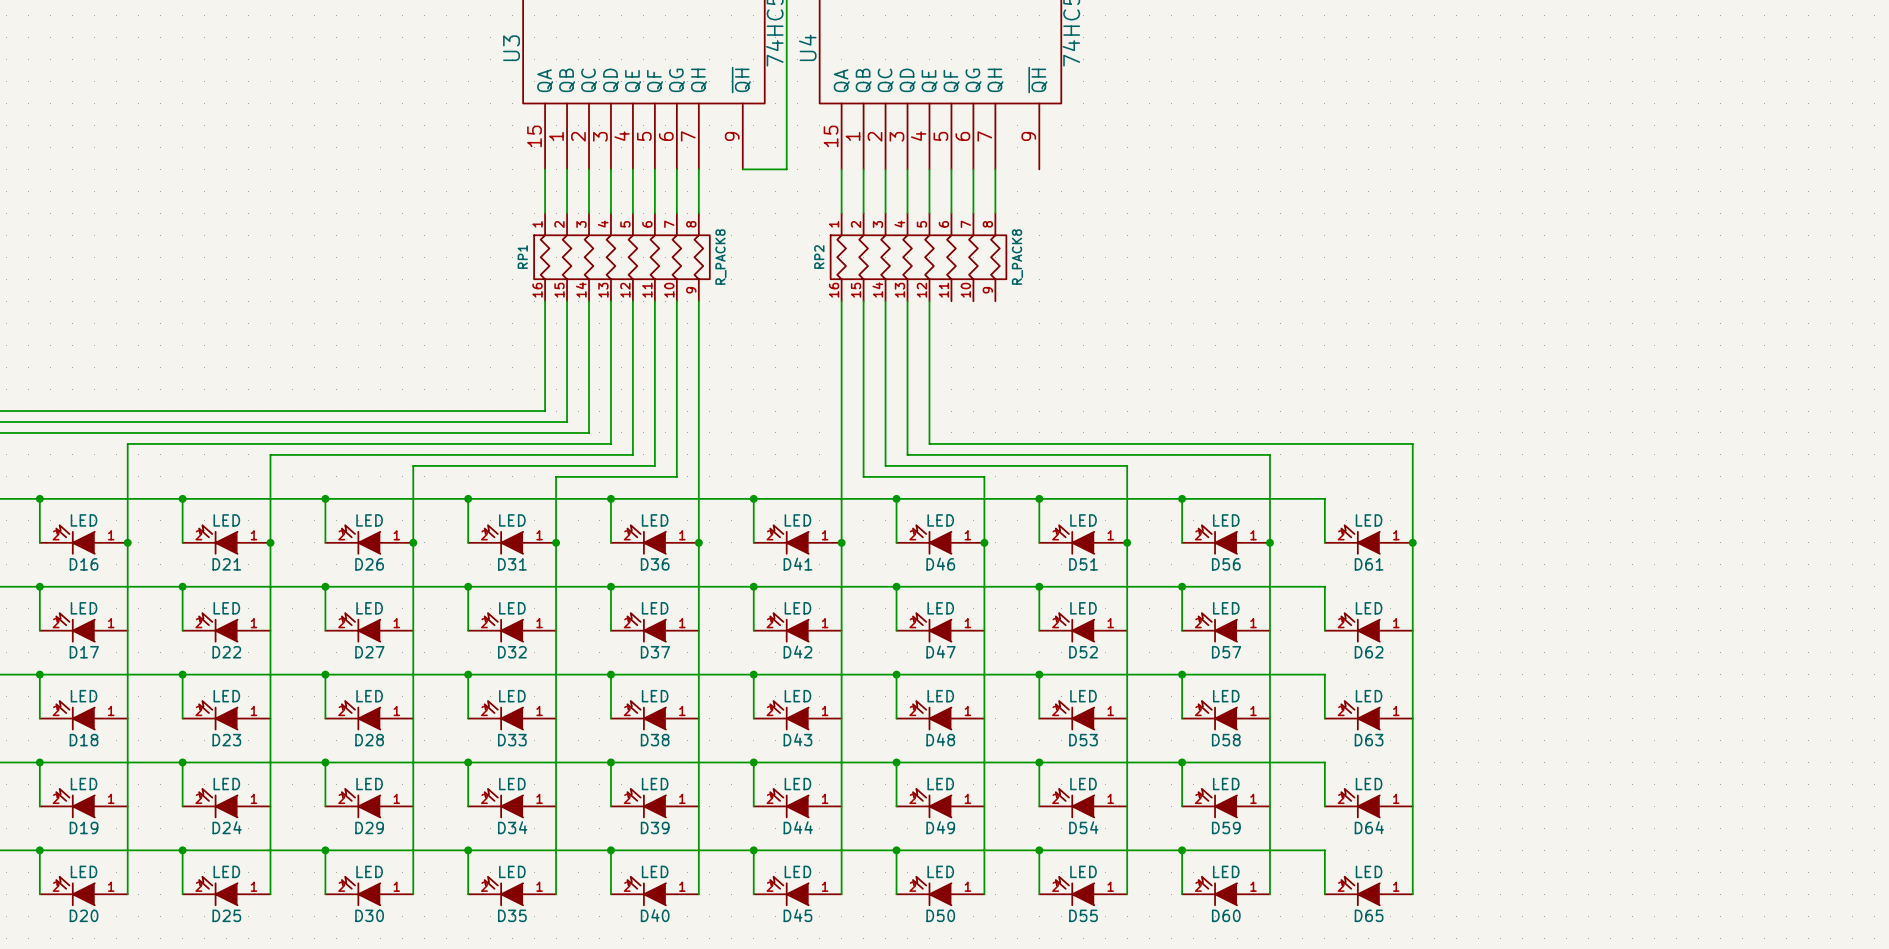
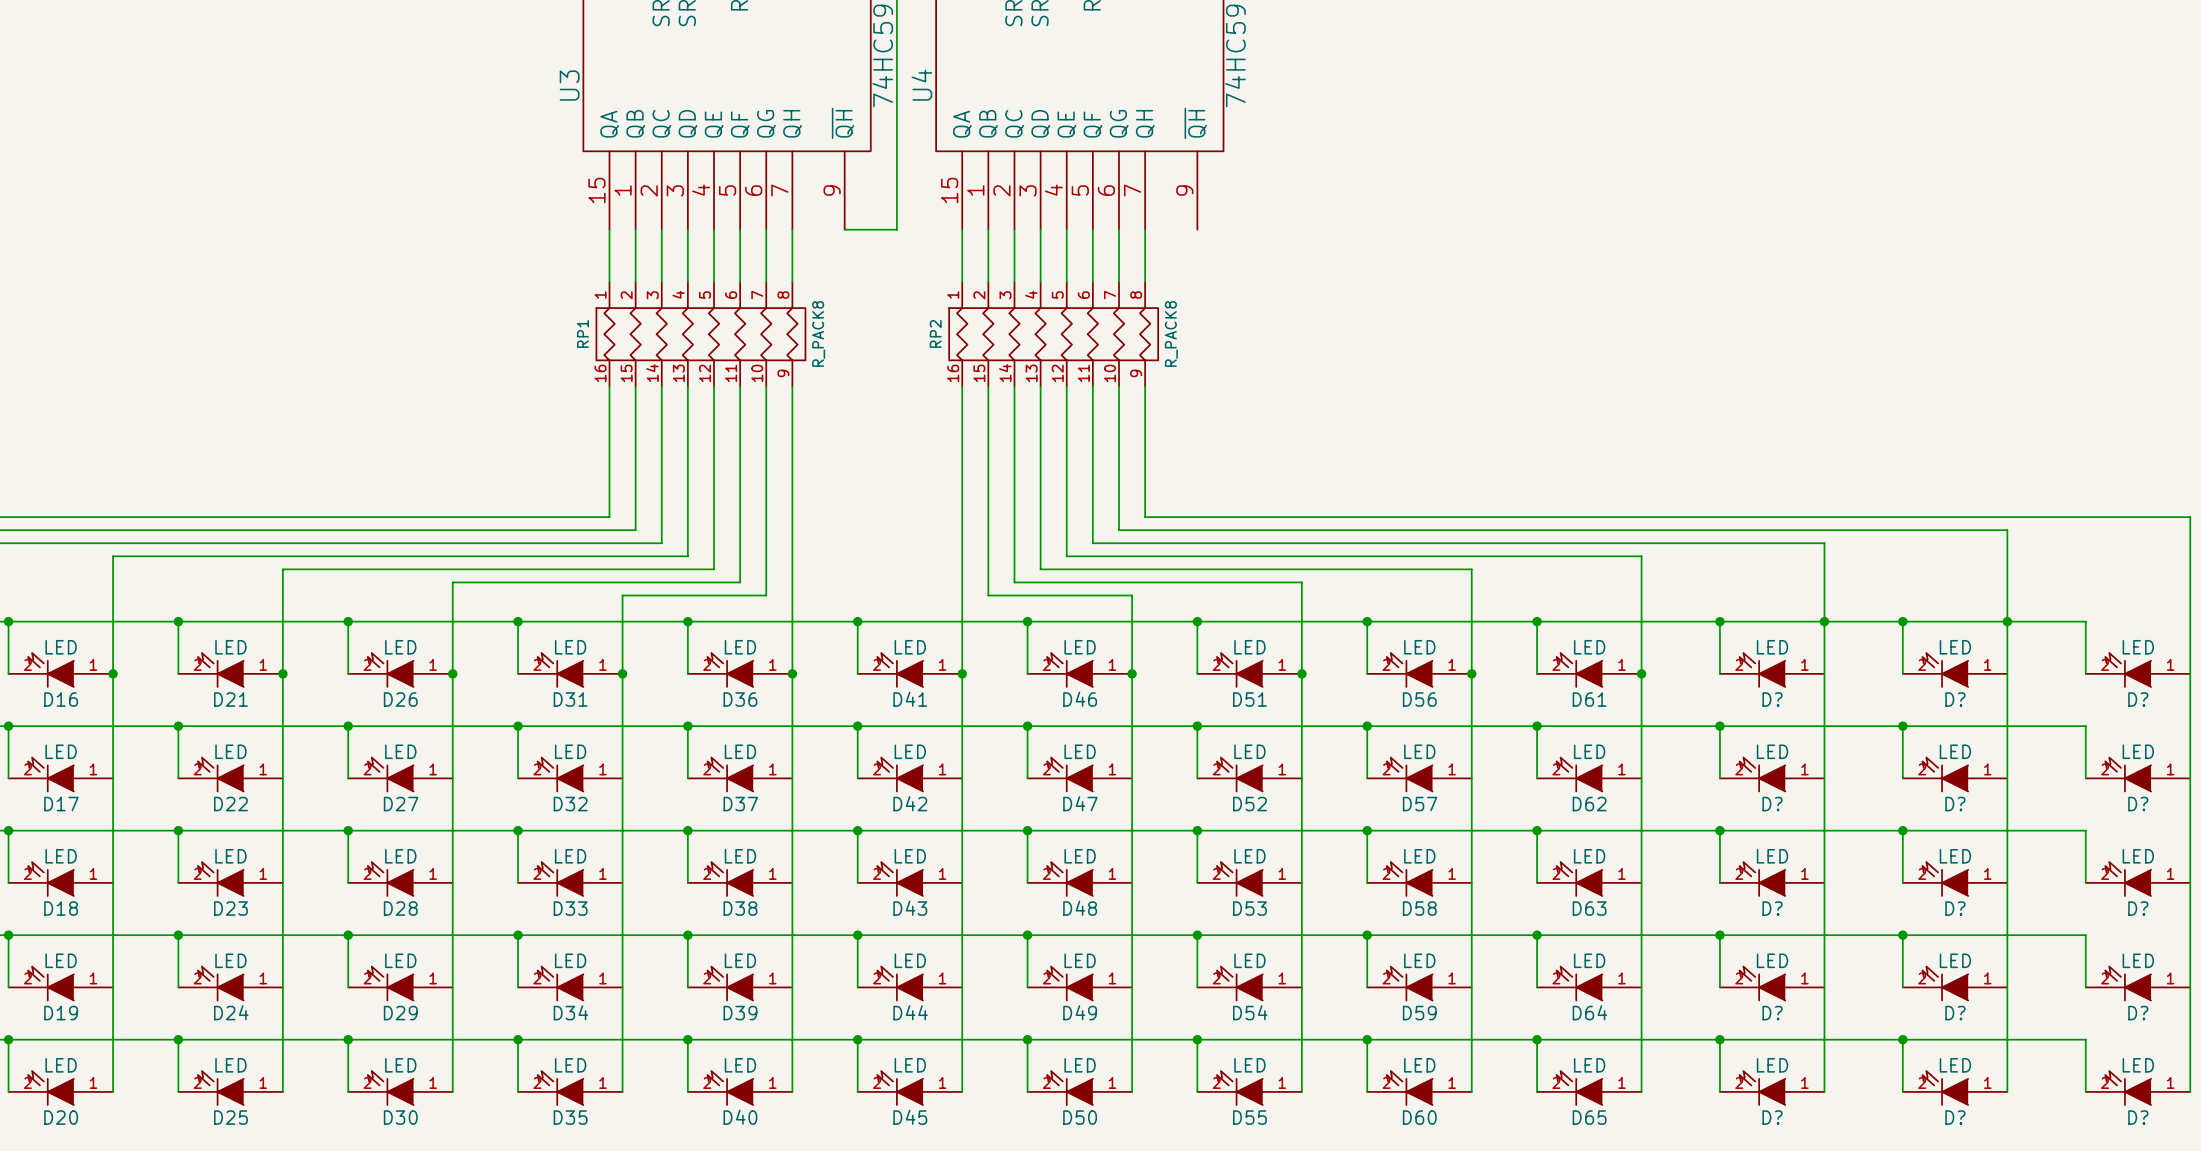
wire: none -> (1092, 386) (1092, 543) (1824, 543) (1824, 1091)
wire: none -> (1119, 386) (1119, 530) (2007, 530) (2007, 1091)
wire: none -> (1145, 386) (1145, 517) (2190, 517) (2190, 1091)
wire: none -> (1537, 621) (2085, 621) (2085, 673)
junction: none -> (1537, 621)
wire: none -> (1719, 621) (1719, 673)
junction: none -> (1719, 621)
junction: none -> (1824, 621)
wire: none -> (1902, 621) (1902, 673)
junction: none -> (1902, 621)
junction: none -> (2007, 621)
D?: none -> LED (1772, 669)
D?: none -> LED (1955, 669)
D?: none -> LED (2138, 669)
wire: none -> (1537, 726) (2085, 726) (2085, 778)
junction: none -> (1537, 726)
wire: none -> (1719, 726) (1719, 778)
junction: none -> (1719, 726)
wire: none -> (1902, 726) (1902, 778)
junction: none -> (1902, 726)
D?: none -> LED (1772, 774)
D?: none -> LED (1955, 774)
D?: none -> LED (2138, 774)
wire: none -> (1537, 830) (2085, 830) (2085, 882)
junction: none -> (1537, 830)
wire: none -> (1719, 830) (1719, 882)
junction: none -> (1719, 830)
wire: none -> (1902, 830) (1902, 882)
junction: none -> (1902, 830)
D?: none -> LED (1772, 878)
D?: none -> LED (1955, 878)
D?: none -> LED (2138, 878)
wire: none -> (1537, 935) (2085, 935) (2085, 987)
junction: none -> (1537, 935)
wire: none -> (1719, 935) (1719, 987)
junction: none -> (1719, 935)
wire: none -> (1902, 935) (1902, 987)
junction: none -> (1902, 935)
D?: none -> LED (1772, 983)
D?: none -> LED (1955, 983)
D?: none -> LED (2138, 983)
wire: none -> (1537, 1039) (2085, 1039) (2085, 1091)
junction: none -> (1537, 1039)
wire: none -> (1719, 1039) (1719, 1091)
junction: none -> (1719, 1039)
wire: none -> (1902, 1039) (1902, 1091)
junction: none -> (1902, 1039)
D?: none -> LED (1772, 1088)
D?: none -> LED (1955, 1088)
D?: none -> LED (2138, 1088)

